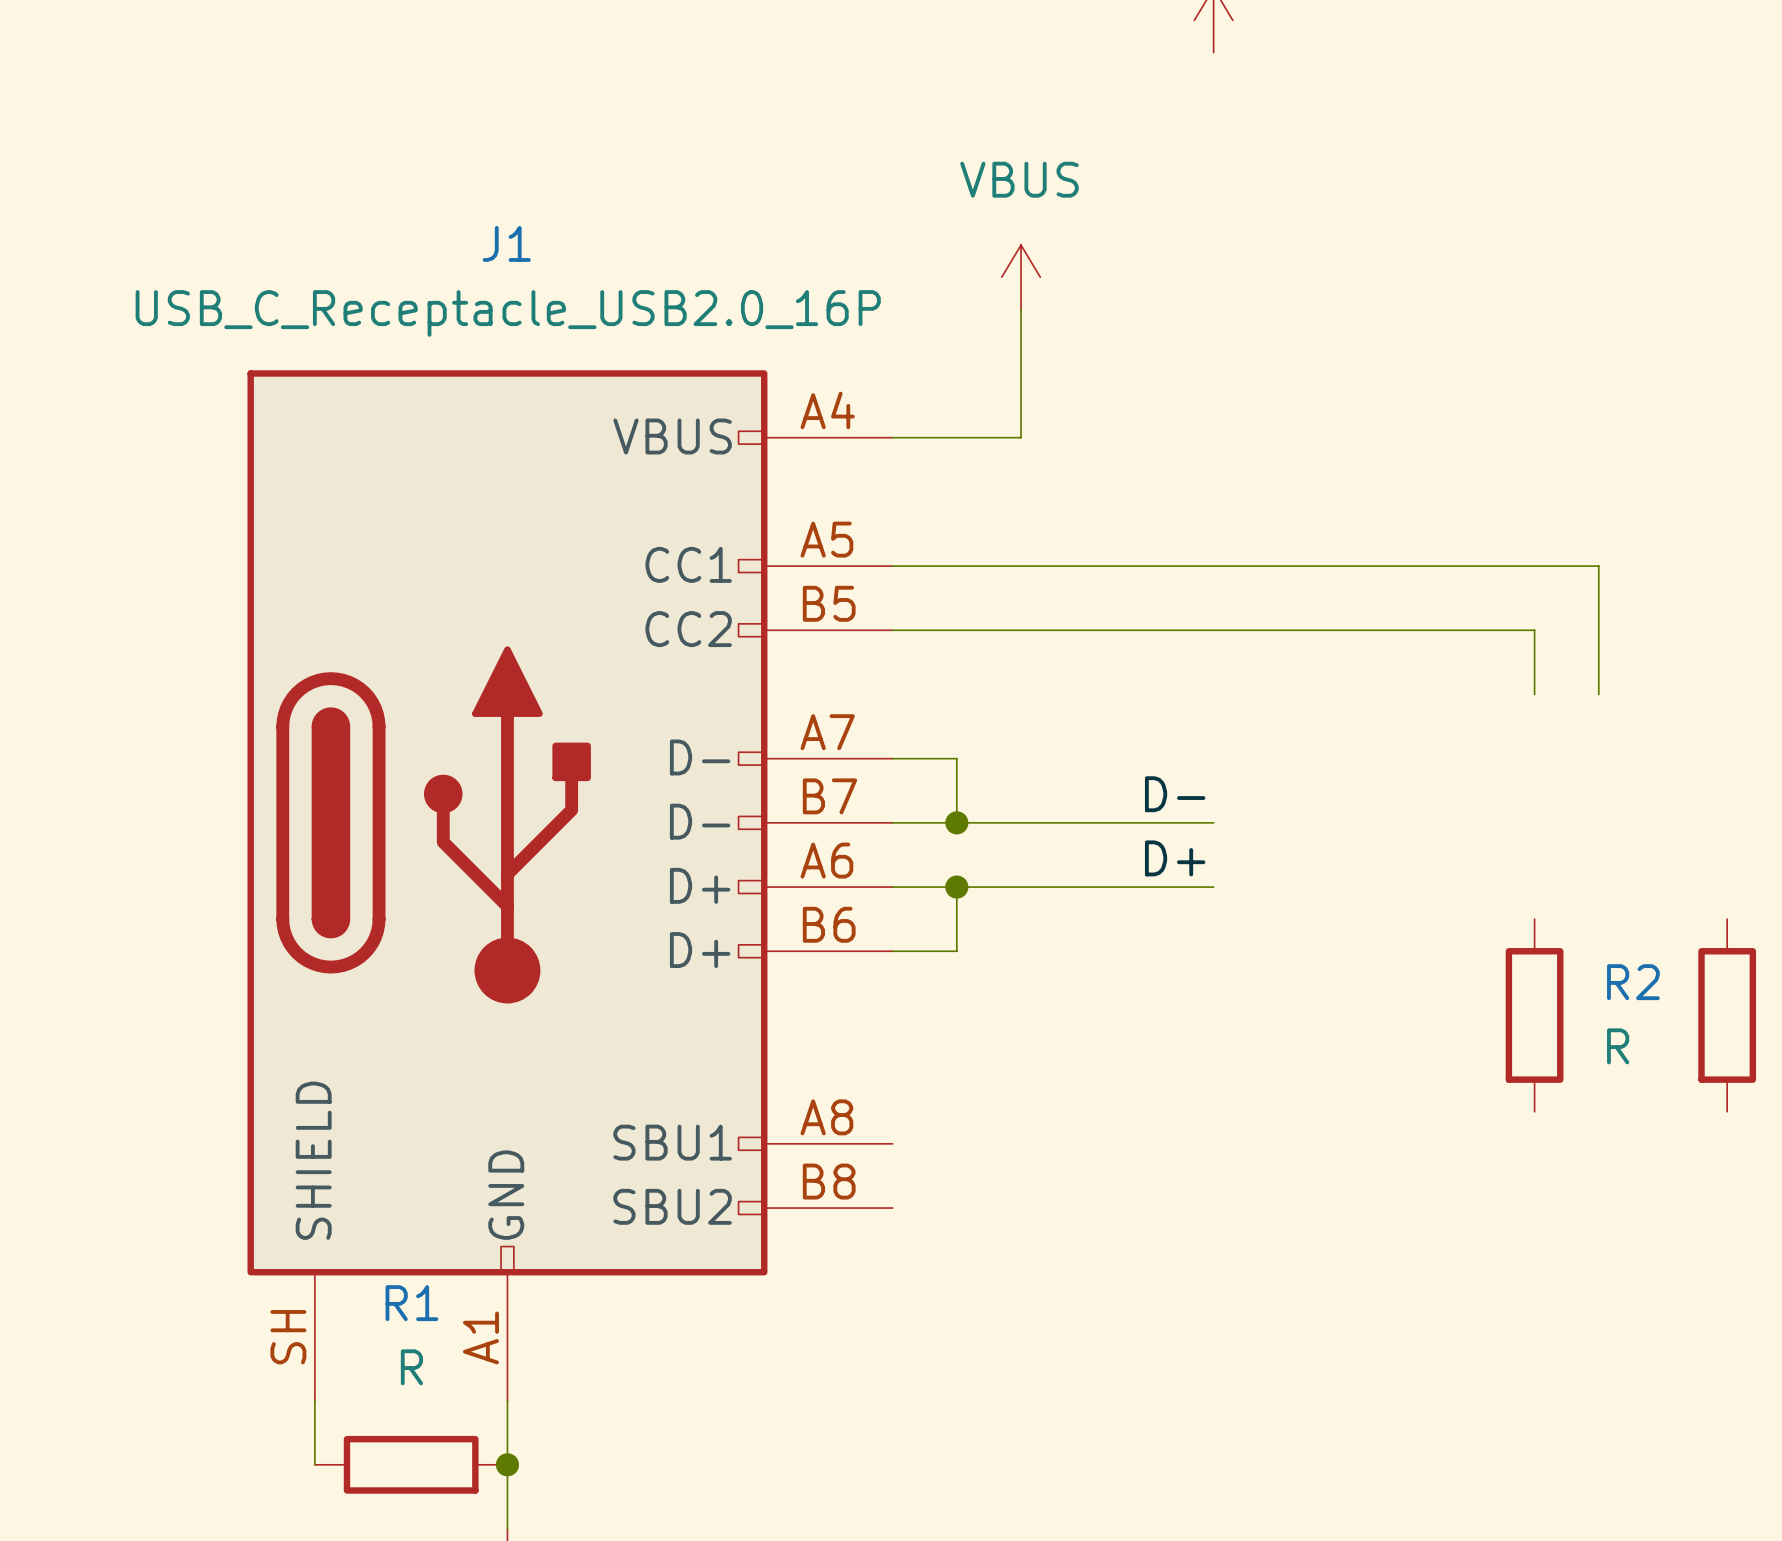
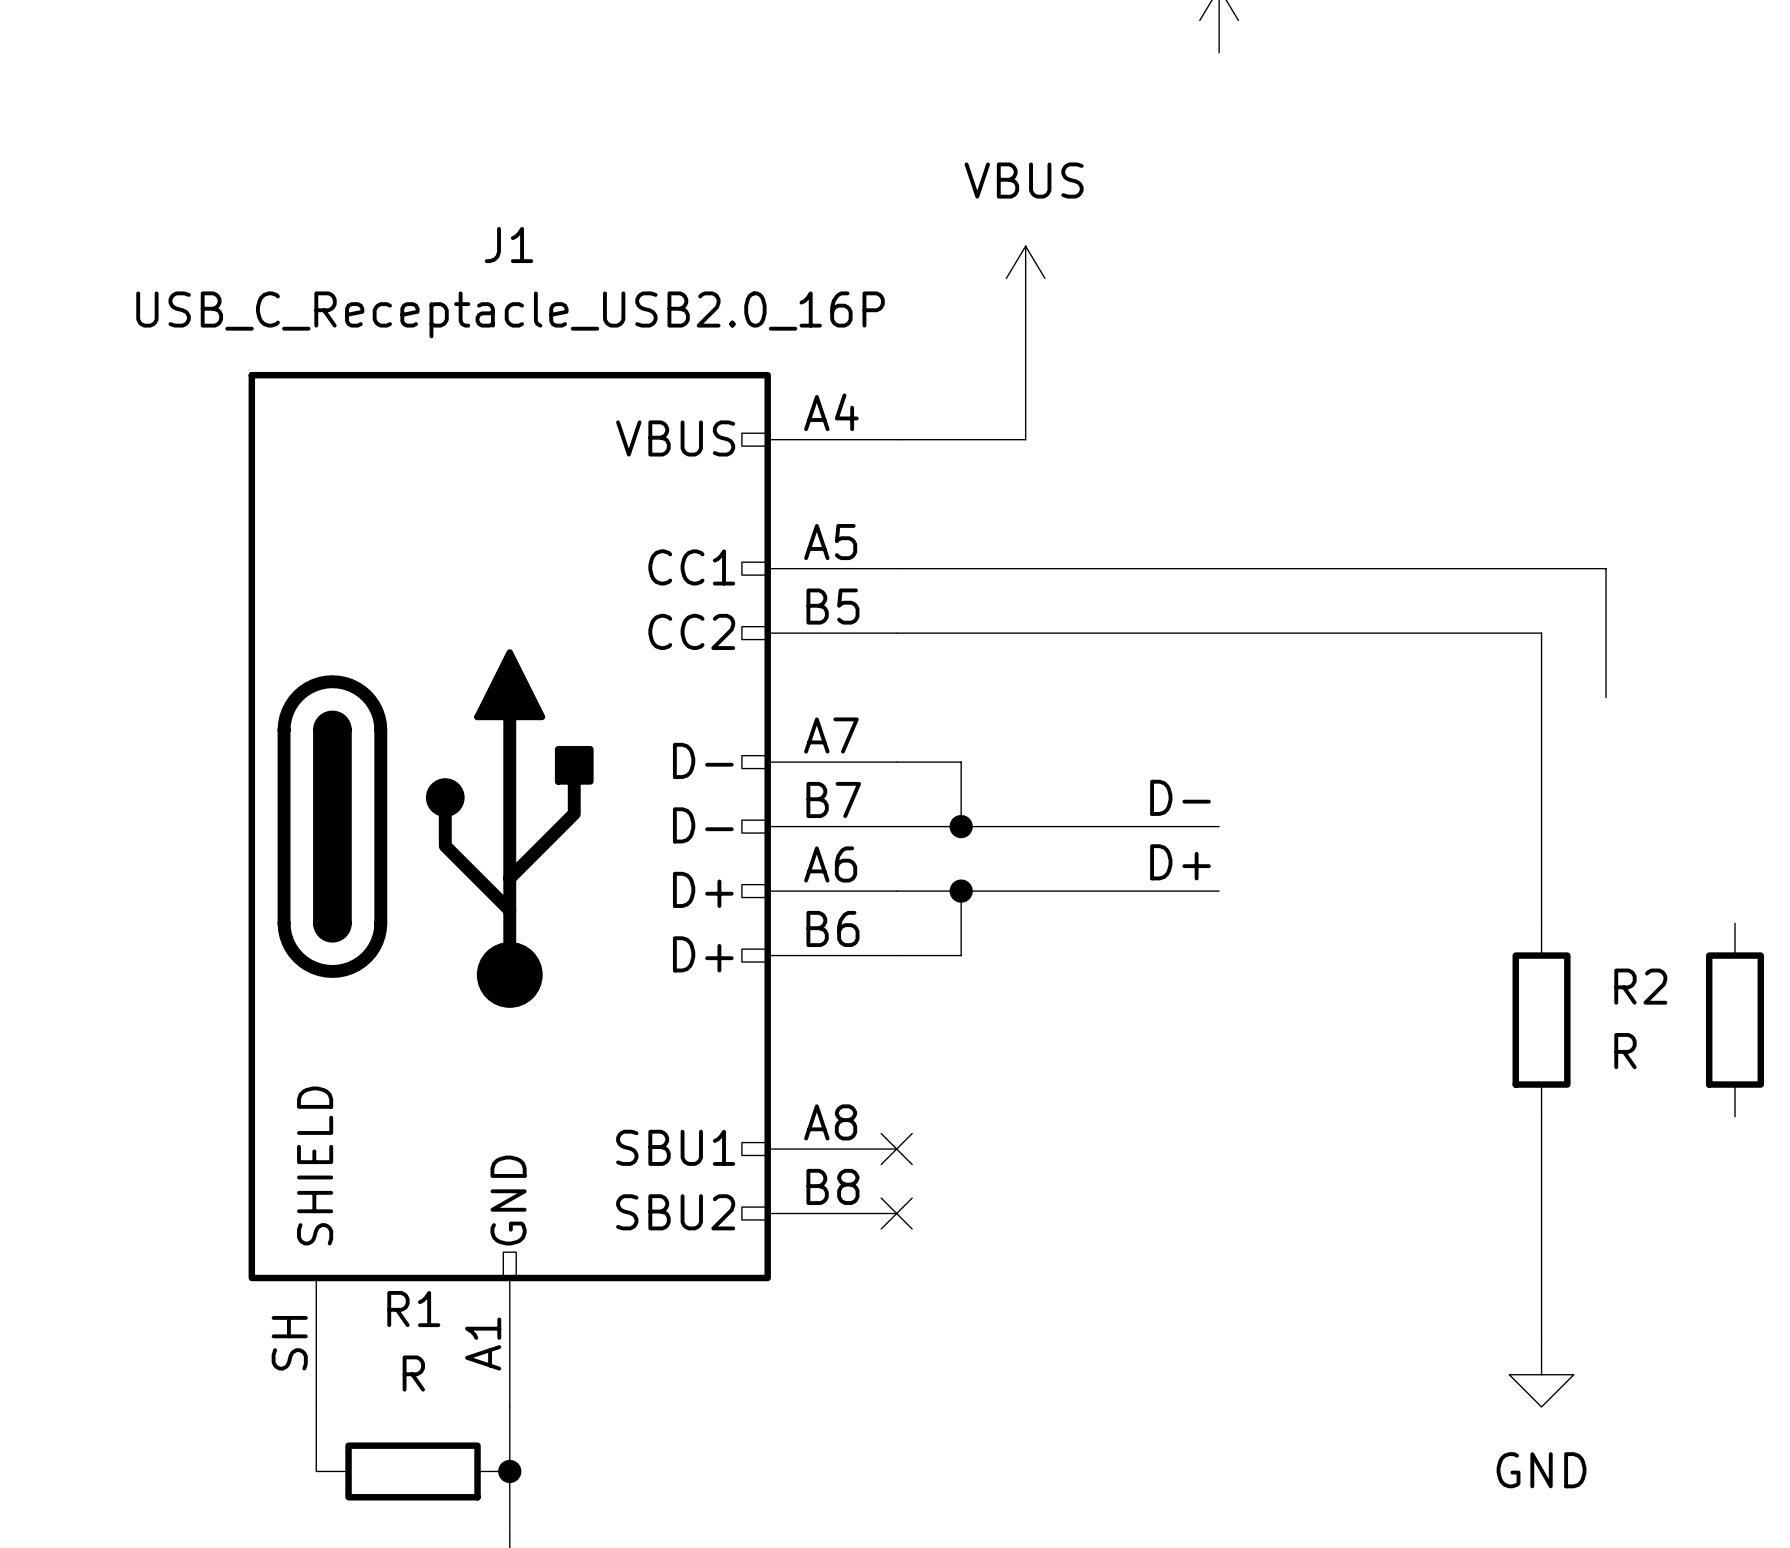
wire: none -> (1541, 697) (1541, 923)
wire: none -> (1541, 1116) (1541, 1342)
no-connect mark: none -> (896, 1149)
no-connect mark: none -> (896, 1213)
power symbol: none -> GND (1541, 1374)

